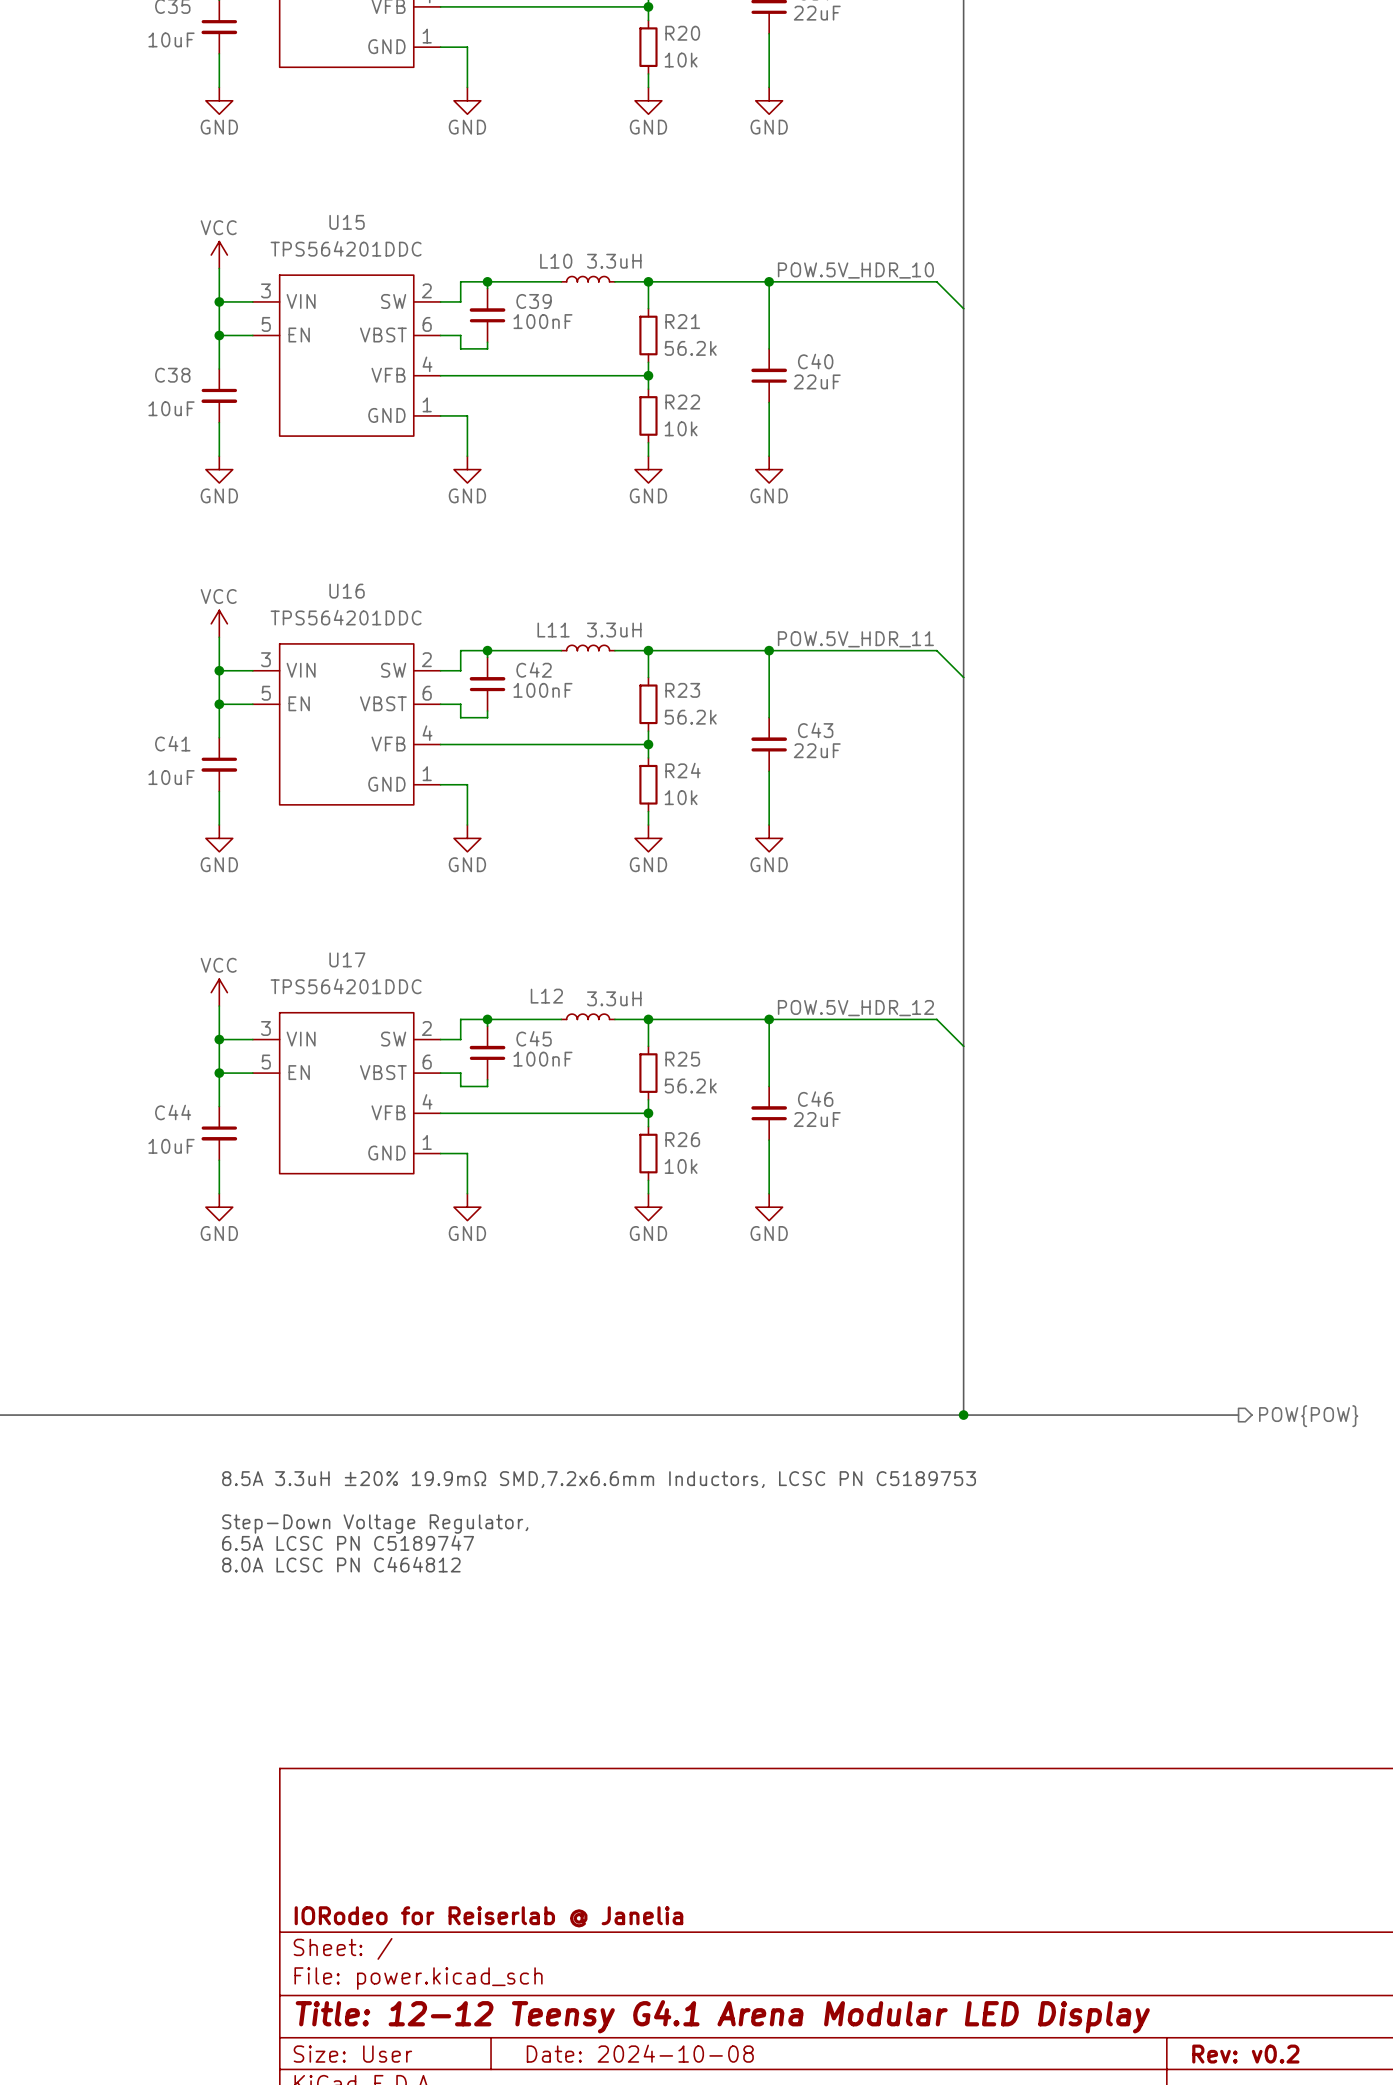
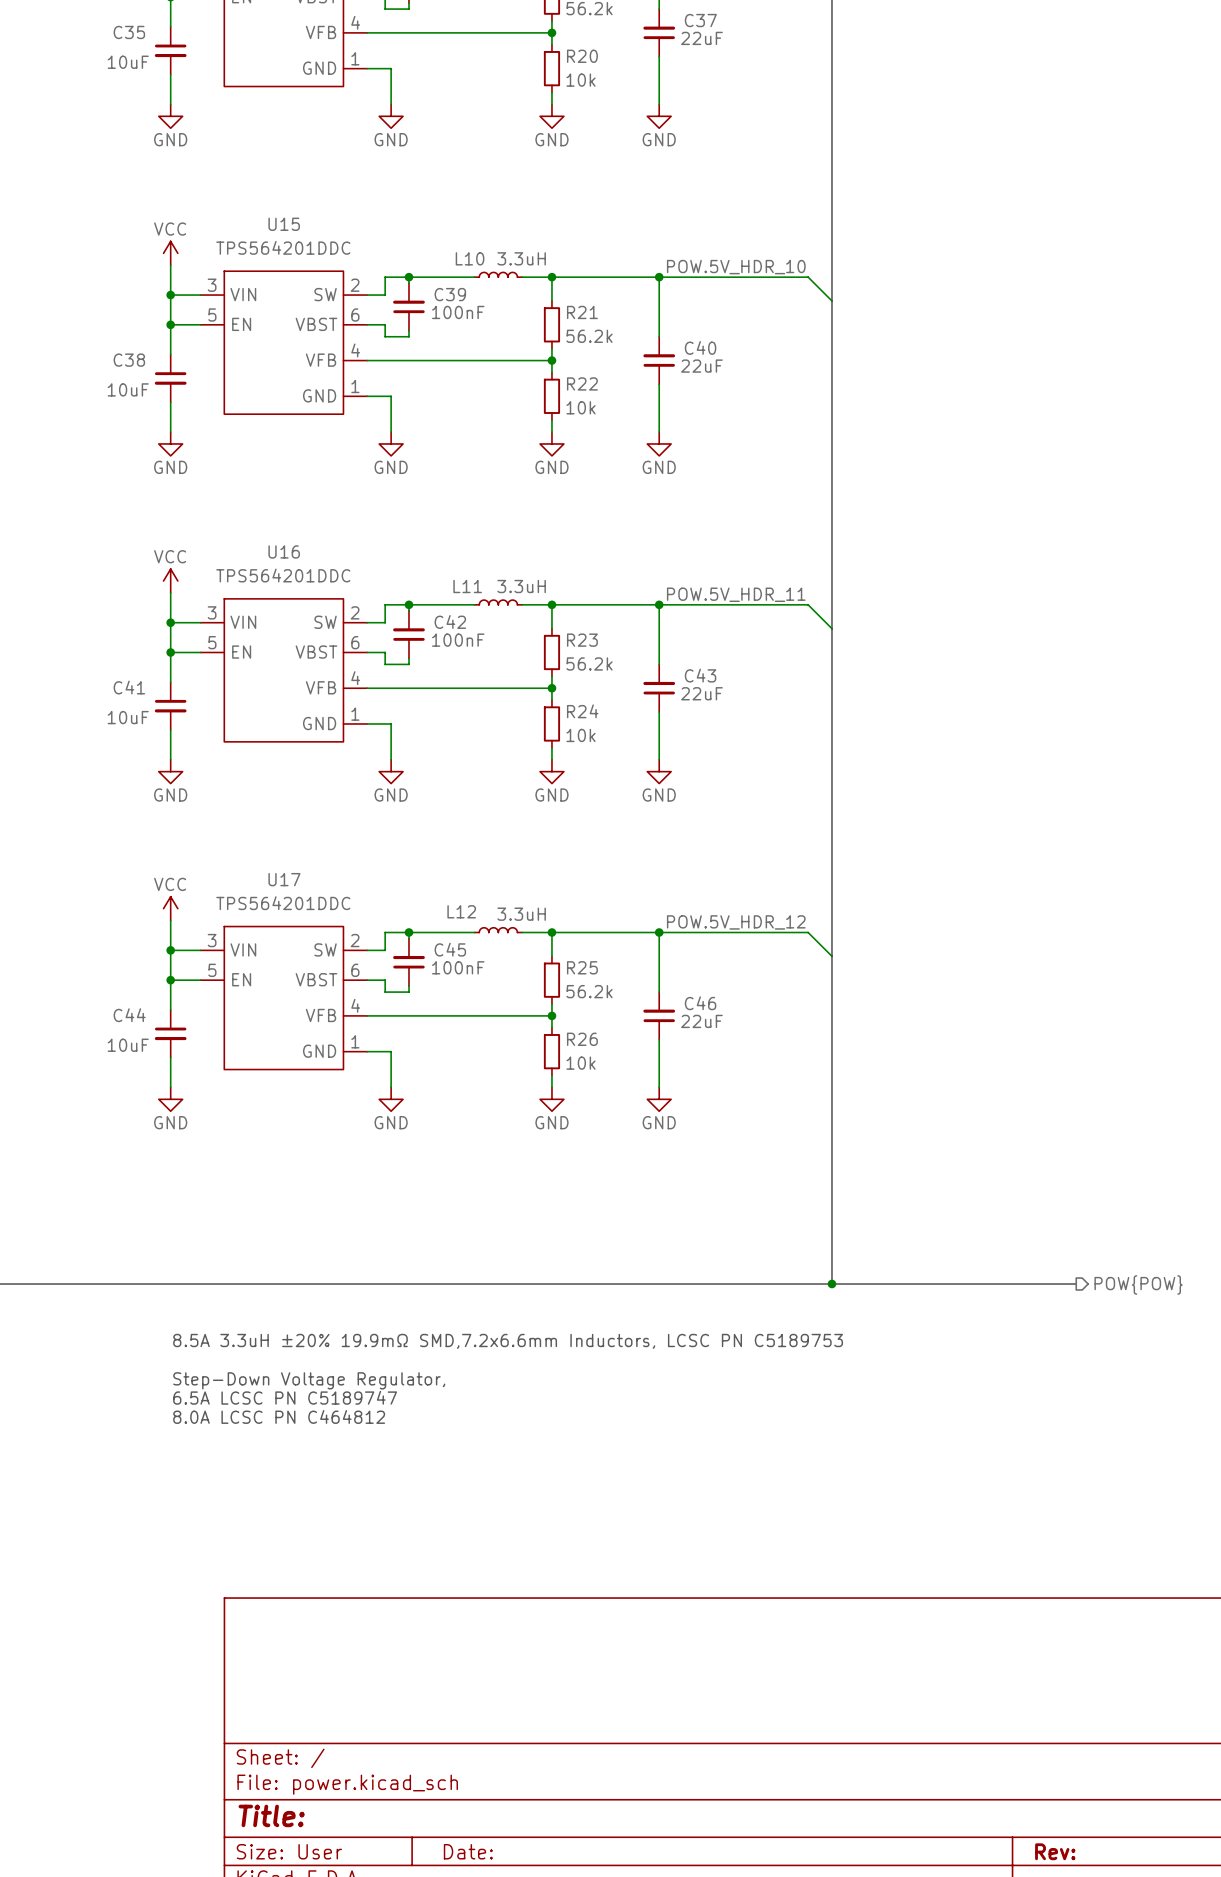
title block: IORodeo for Reiserlab @ Janelia (488, 1916) -> none
title block: Title: 12-12 Teensy G4.1 Arena Modular LED Display (722, 2016) -> Title: (271, 1815)
title block: Date: 2024-10-08 (640, 2053) -> Date: (468, 1851)
title block: Rev: v0.2 (1245, 2054) -> Rev: (1055, 1851)

